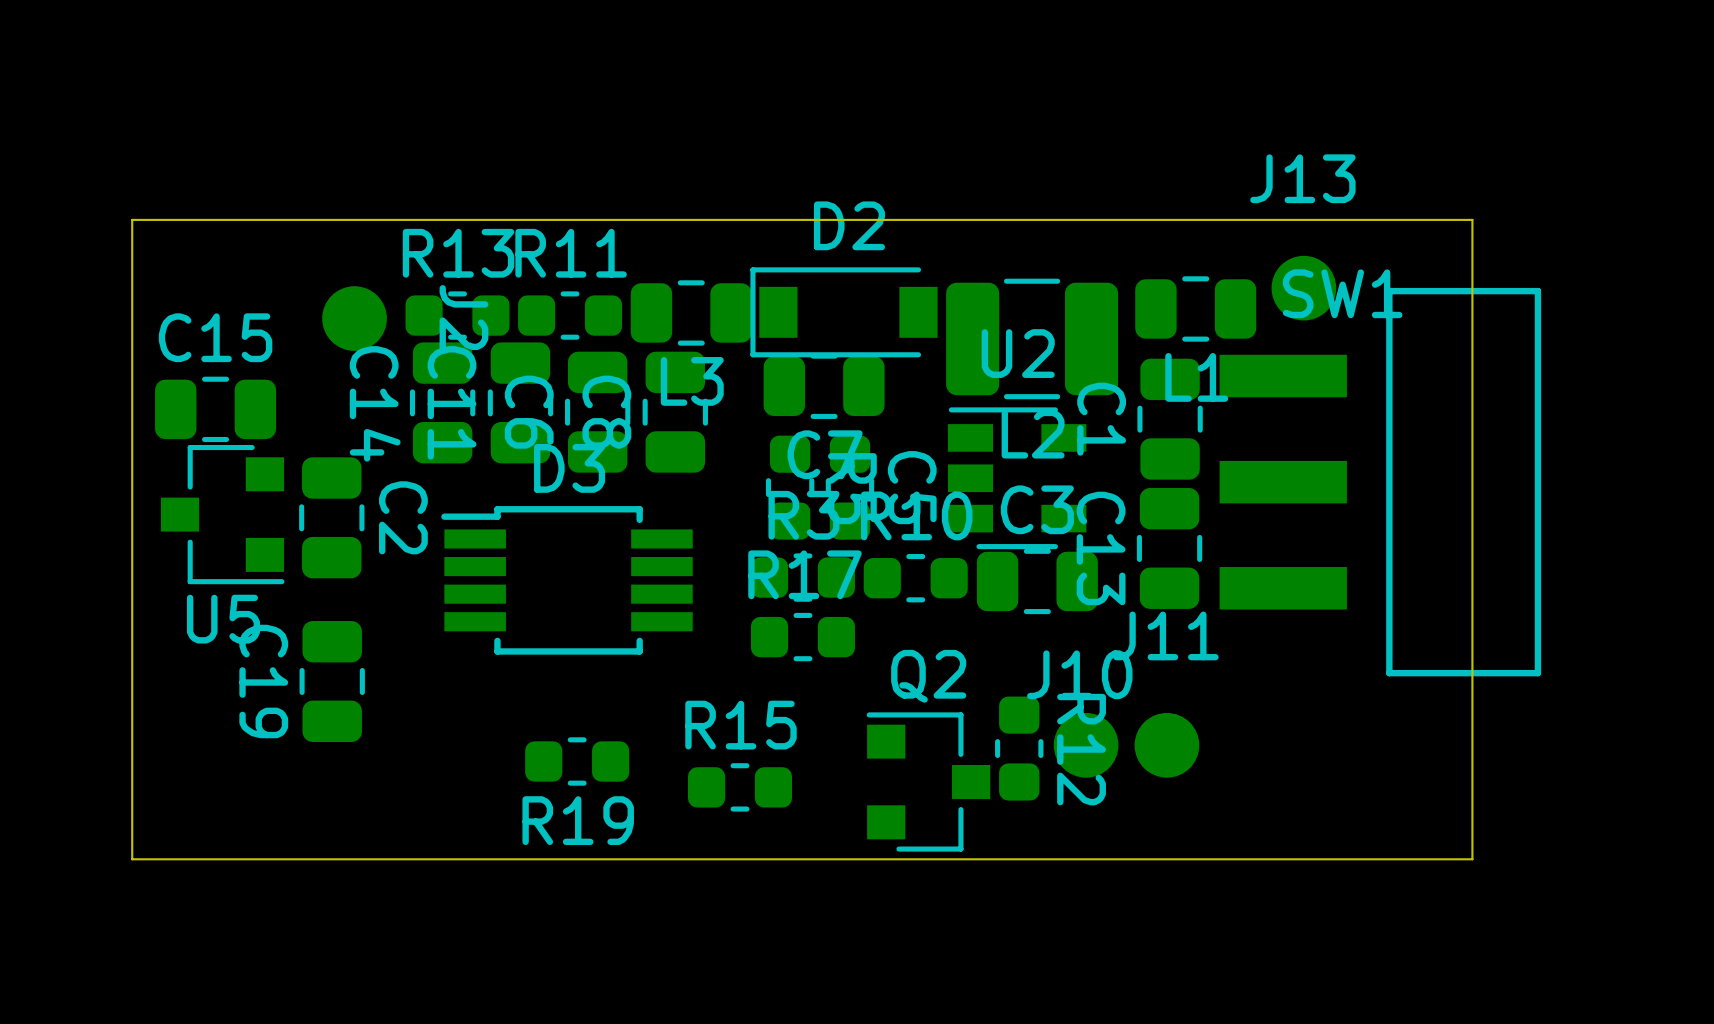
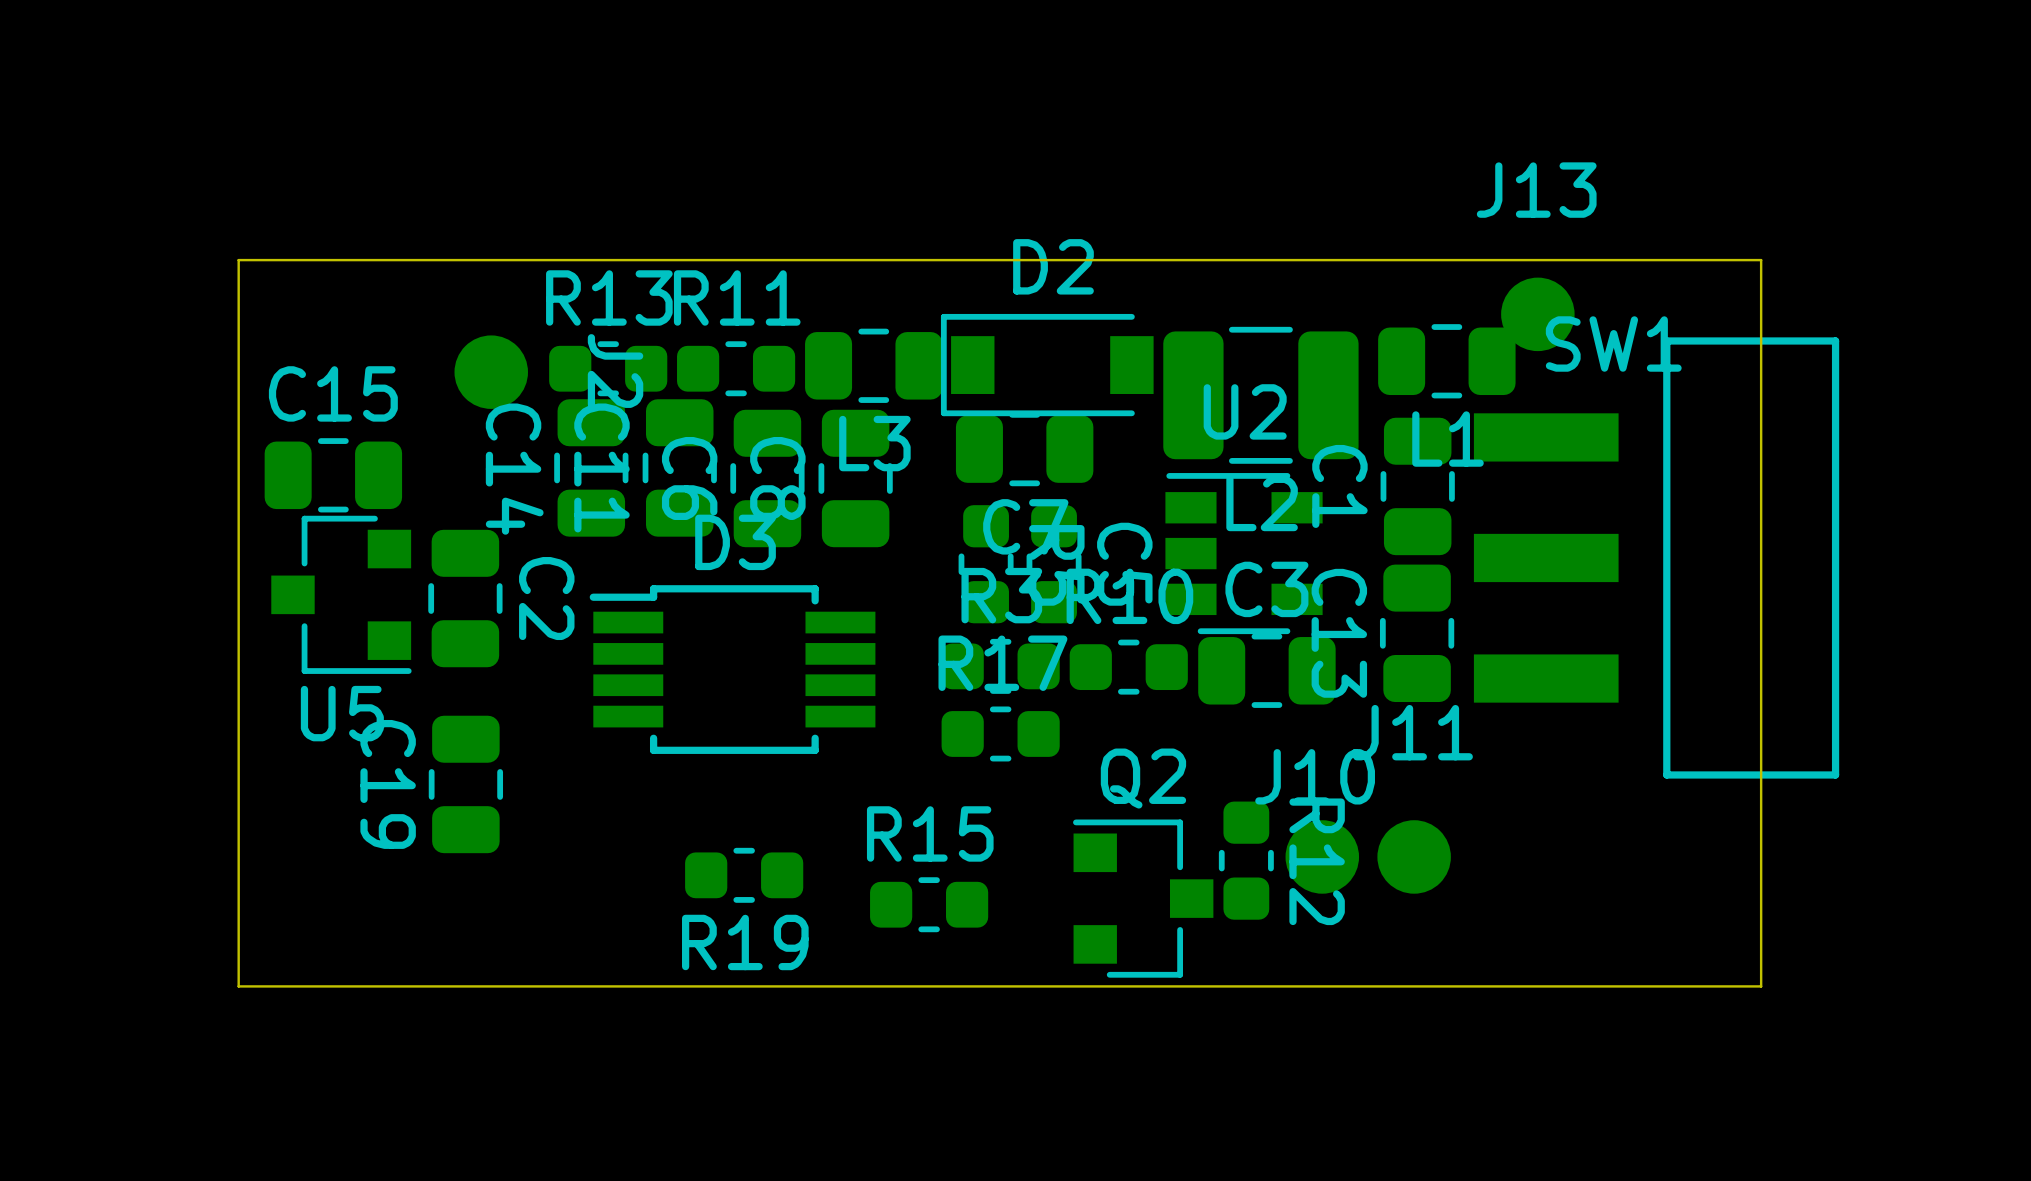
J13 position: (1303, 288) -> (1537, 314)

